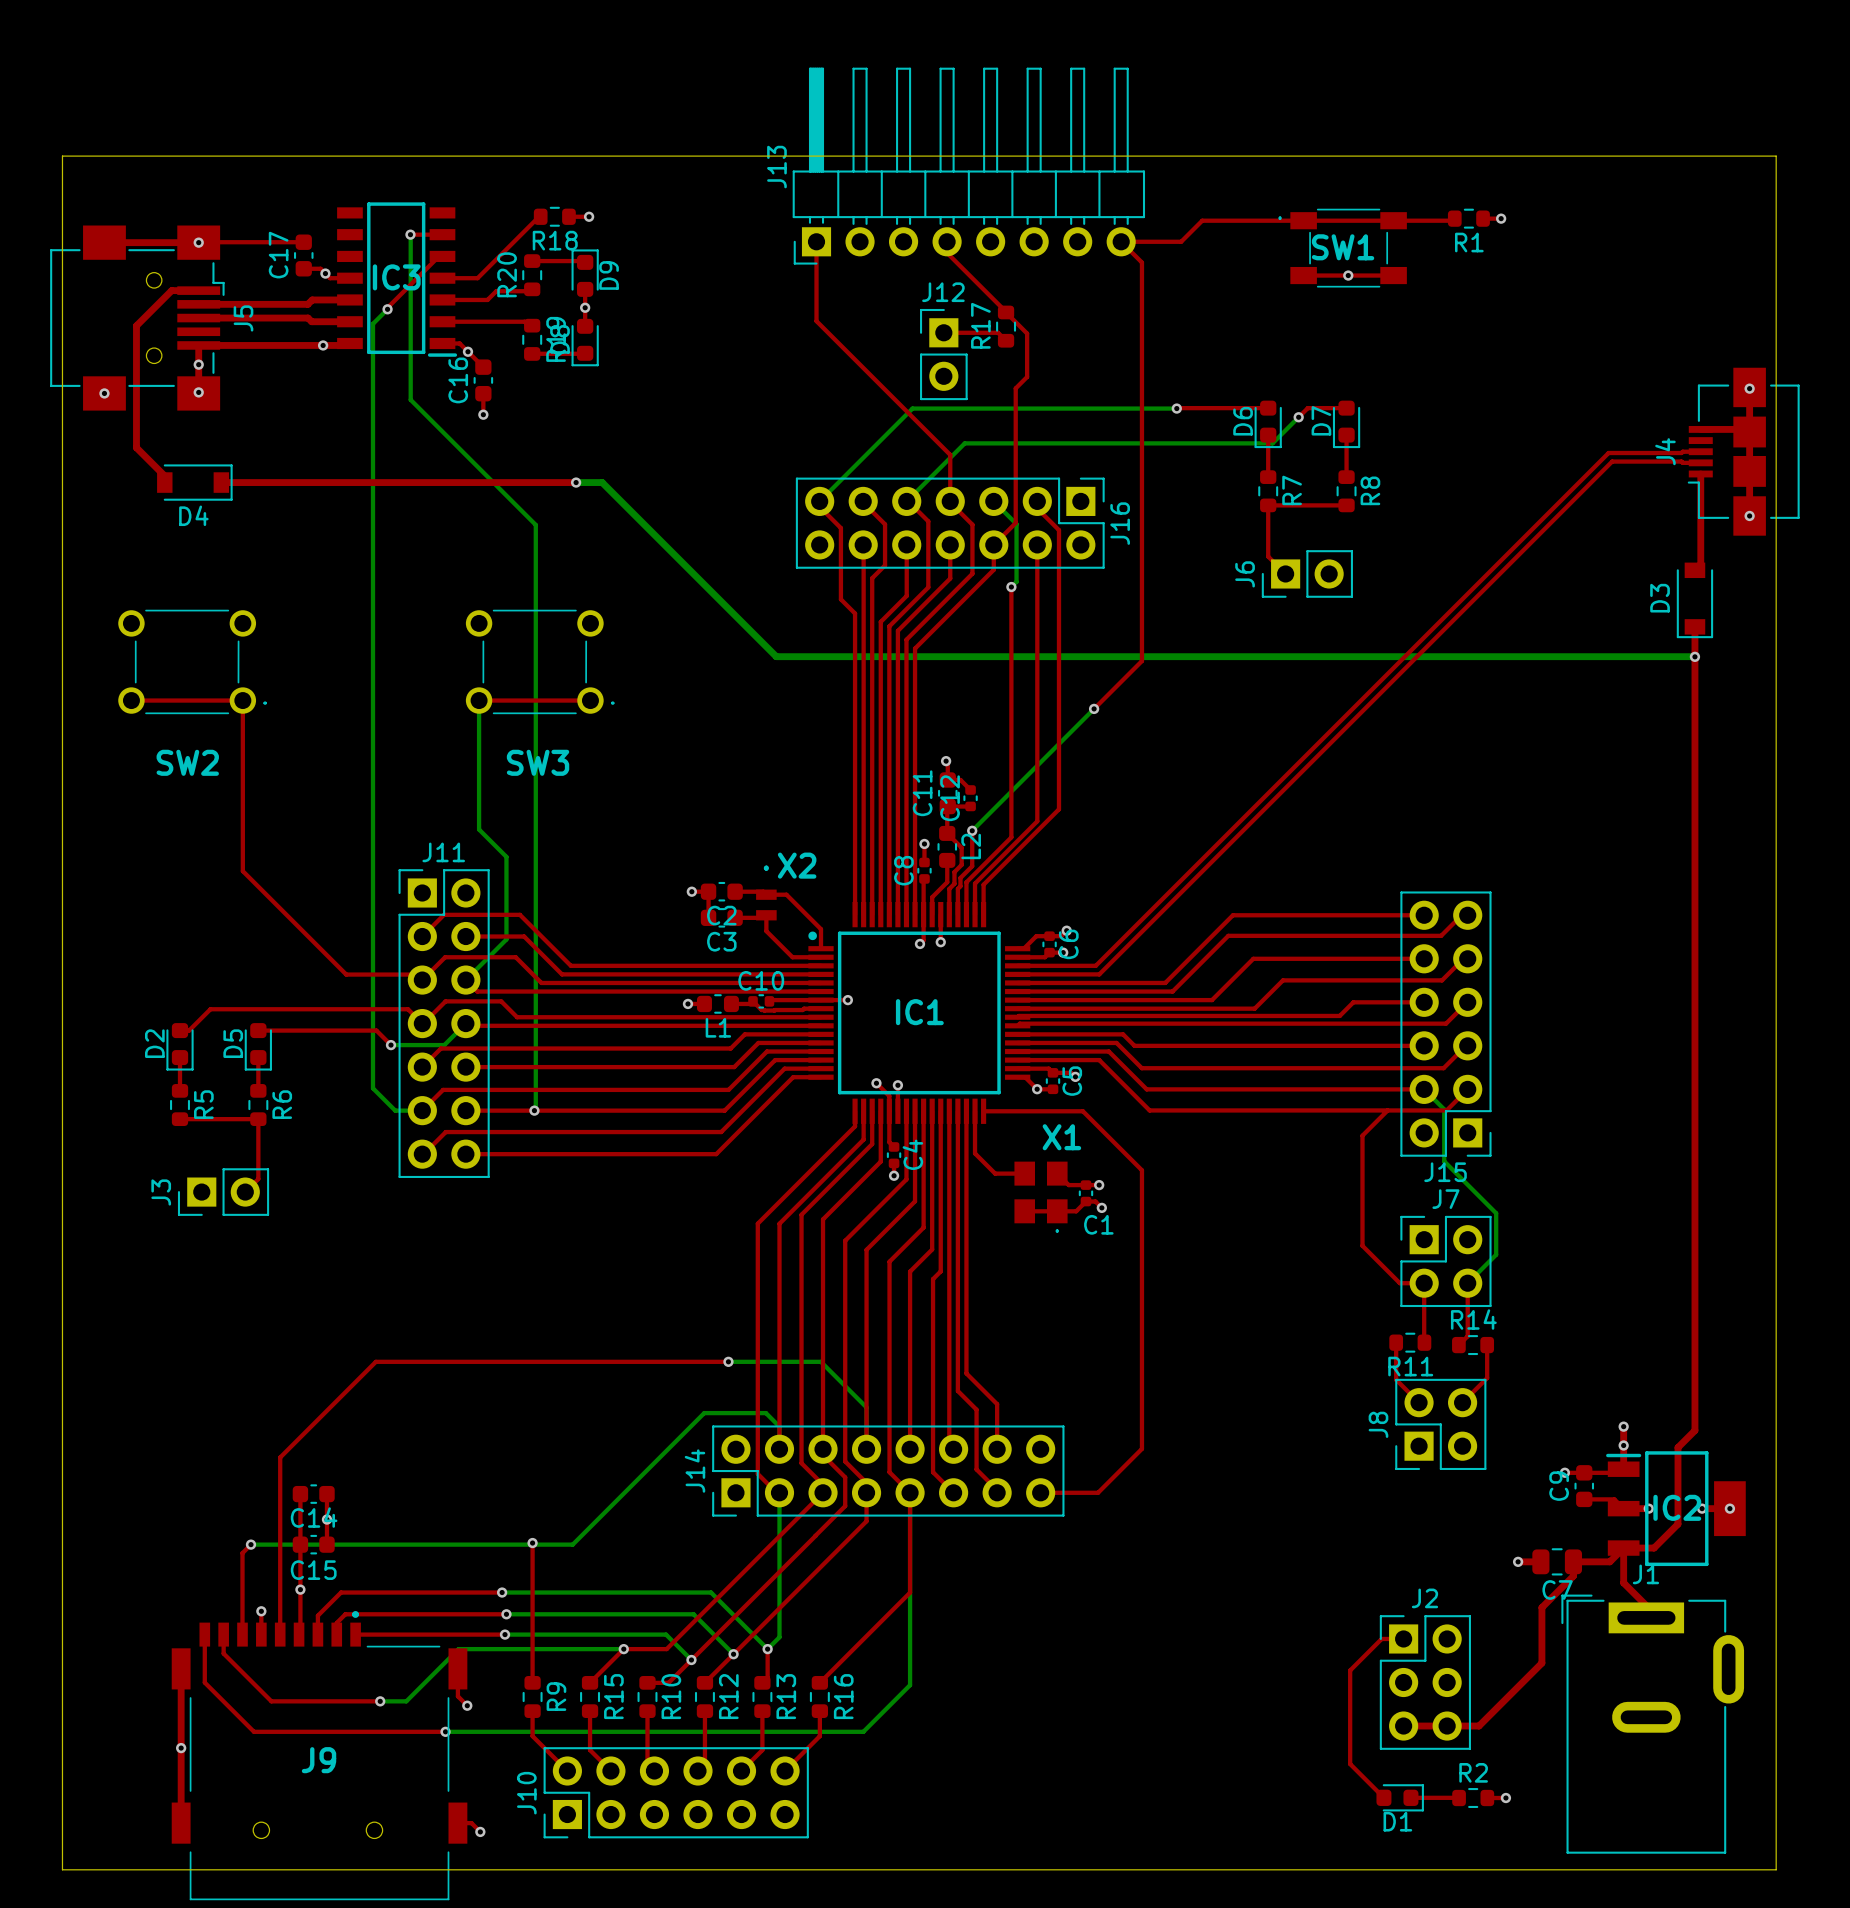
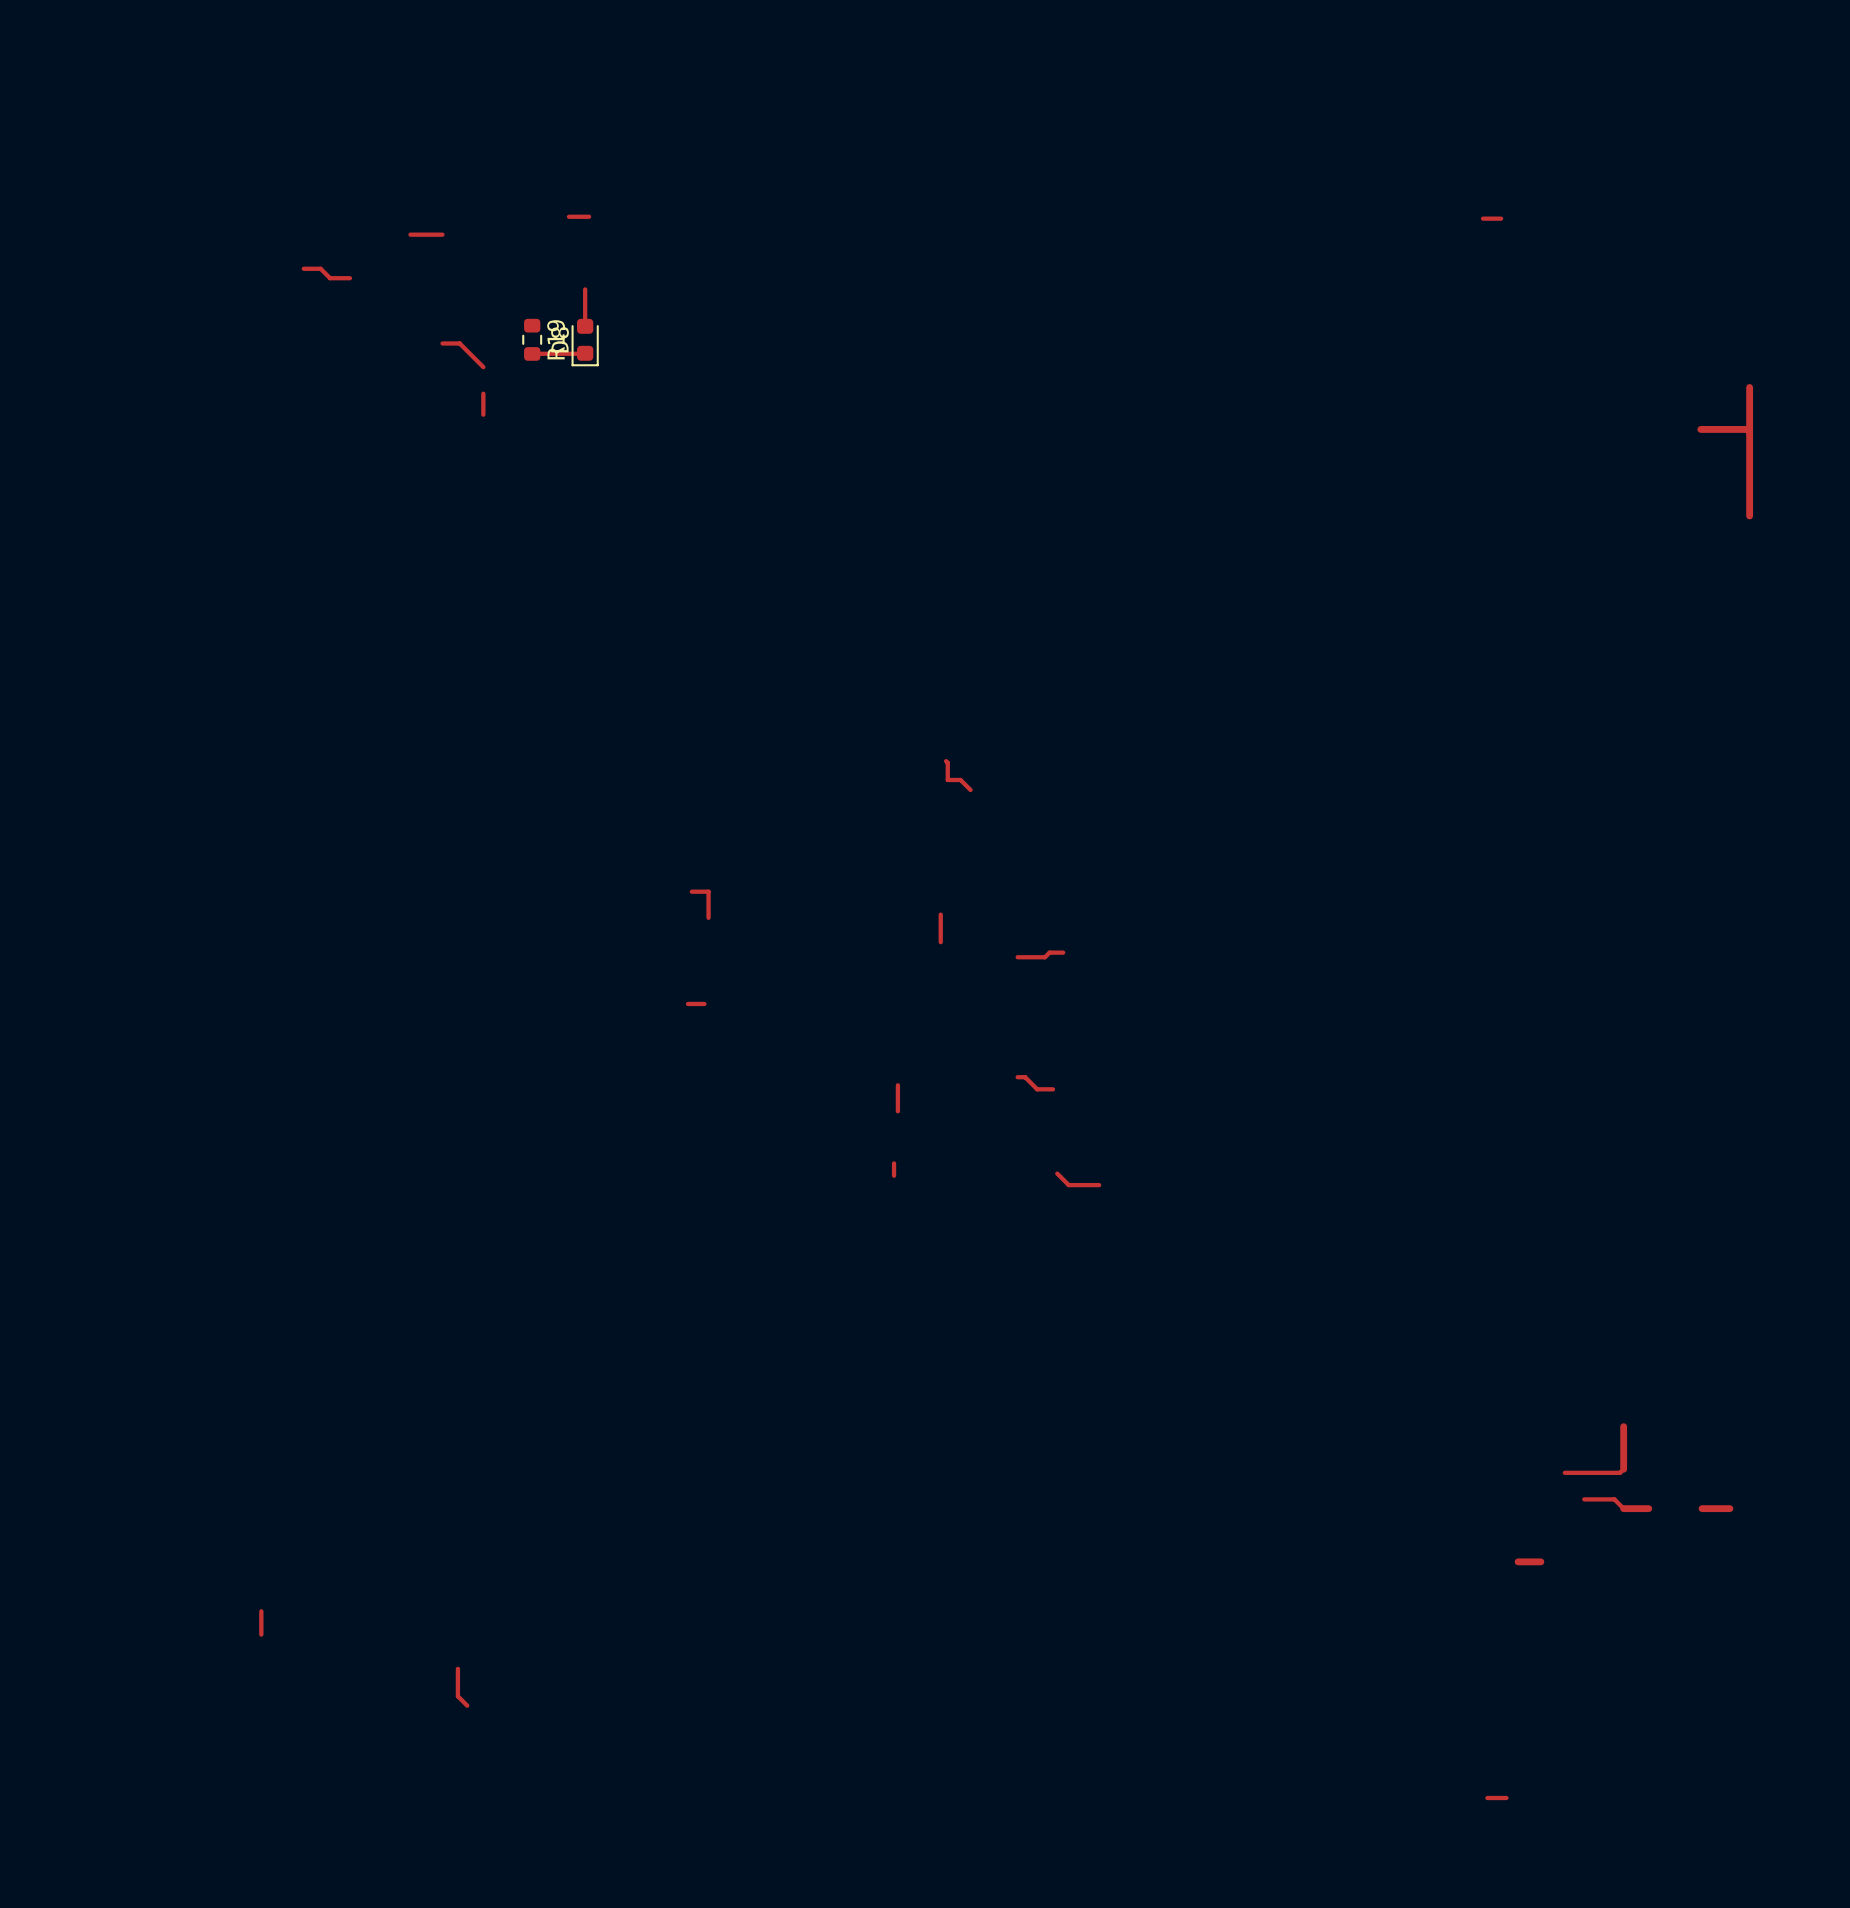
board edge: (62, 156) (62, 1869) (1776, 1869) (1776, 156) (62, 156) -> none
J13: (968, 166) -> none
top track: (540, 216) (477, 278) (442, 278) -> none
R18: (554, 216) -> none
via: (589, 216) -> none
top track: (1454, 218) (1452, 220) (1202, 220) (1181, 241) (1121, 241) (1141, 262) (1141, 661) (1094, 708) -> none
R1: (1468, 218) -> none
via: (1501, 218) -> none
bottom track: (410, 234) (410, 399) (535, 524) (534, 1110) -> none
via: (410, 234) -> none
top track: (816, 241) (816, 321) (950, 454) (950, 502) (972, 524) (972, 573) (906, 639) (906, 914) -> none
top track: (947, 241) (947, 252) (1027, 333) (1027, 376) (1015, 388) (1015, 523) (993, 544) (993, 569) (915, 648) (915, 914) -> none
via: (198, 242) -> none
top track: (303, 242) (104, 242) -> none
SW1: (1342, 248) -> none
C17: (303, 255) -> none
top track: (442, 256) (438, 256) (387, 309) -> none
top track: (532, 261) (585, 262) -> none
via: (325, 273) -> none
D9: (585, 273) -> none
R20: (532, 275) -> none
top track: (1303, 275) (1393, 275) -> none
via: (1348, 275) -> none
IC3: (397, 279) -> none
top track: (198, 290) (171, 290) (136, 325) (136, 447) (164, 476) (164, 482) -> none
top track: (532, 291) (496, 291) (487, 299) (442, 299) -> none
top track: (349, 299) (312, 299) (307, 304) (198, 304) (200, 304) -> none
via: (585, 307) -> none
bottom track: (387, 309) (373, 323) (373, 1088) (395, 1110) (422, 1110) -> none
via: (387, 309) -> none
J5: (137, 318) -> none
top track: (198, 318) (308, 318) (311, 321) (349, 321) -> none
top track: (442, 321) (524, 321) (528, 325) -> none
R17: (1006, 326) -> none
top track: (943, 332) (998, 332) (1006, 340) -> none
top track: (349, 343) (347, 345) (198, 345) (198, 393) -> none
via: (323, 345) -> none
via: (467, 351) -> none
J12: (943, 354) -> none
via: (198, 364) -> none
C16: (483, 380) -> none
via: (1749, 388) -> none
via: (198, 392) -> none
via: (104, 393) -> none
bottom track: (1176, 408) (912, 408) (819, 501) -> none
via: (1176, 408) -> none
top track: (1268, 408) (1176, 408) -> none
top track: (1346, 408) (1307, 408) (1298, 417) -> none
via: (483, 414) -> none
bottom track: (1298, 417) (1272, 443) (964, 443) (906, 501) -> none
via: (1298, 417) -> none
D6: (1268, 424) -> none
D7: (1346, 424) -> none
top track: (1268, 435) (1268, 477) -> none
top track: (1346, 435) (1346, 477) -> none
top track: (1700, 451) (1608, 453) (1095, 965) (1017, 965) -> none
J4: (1743, 451) -> none
top track: (1700, 462) (1612, 461) (1099, 974) (1017, 974) -> none
top track: (1700, 473) (1700, 564) (1694, 570) -> none
D4: (194, 482) -> none
top track: (221, 482) (576, 482) -> none
bottom track: (576, 482) (602, 482) (776, 656) (1694, 656) -> none
via: (576, 482) -> none
R7: (1268, 491) -> none
R8: (1346, 491) -> none
top track: (819, 501) (819, 506) (840, 528) (840, 599) (855, 613) (855, 914) -> none
top track: (863, 501) (885, 524) (885, 565) (872, 578) (872, 914) -> none
top track: (906, 501) (928, 521) (928, 587) (889, 626) (889, 914) -> none
bottom track: (993, 501) (1016, 524) (1016, 581) (1011, 587) -> none
top track: (1037, 501) (1037, 508) (1059, 530) (1059, 809) (983, 884) (983, 914) -> none
top track: (1346, 505) (1268, 505) (1268, 556) (1285, 573) -> none
via: (1749, 515) -> none
J16: (950, 523) -> none
top track: (863, 544) (863, 914) -> none
top track: (906, 544) (906, 595) (880, 621) (880, 914) -> none
top track: (950, 544) (950, 578) (897, 630) (897, 914) -> none
top track: (1037, 544) (1037, 821) (975, 883) (975, 914) -> none
J6: (1307, 573) -> none
top track: (1011, 587) (1011, 837) (966, 882) (966, 914) -> none
via: (1011, 587) -> none
D3: (1694, 600) -> none
top track: (1694, 626) (1694, 1430) (1677, 1447) (1677, 1524) (1654, 1548) (1623, 1548) -> none
via: (1694, 656) -> none
SW2: (192, 661) -> none
SW3: (540, 661) -> none
top track: (131, 700) (242, 700) (242, 871) (346, 974) (416, 974) (422, 980) (445, 957) (515, 957) (541, 982) (821, 982) -> none
top track: (479, 700) (590, 700) -> none
bottom track: (479, 700) (479, 829) (506, 856) (506, 939) (465, 980) -> none
bottom track: (1094, 708) (972, 830) -> none
via: (1094, 708) -> none
via: (946, 761) -> none
C11: (947, 793) -> none
C12: (970, 798) -> none
top track: (970, 806) (947, 807) (947, 833) (961, 847) (961, 864) (954, 872) (954, 883) (949, 888) (949, 914) -> none
top track: (972, 830) (972, 866) (960, 878) (960, 886) (957, 888) (957, 914) -> none
via: (972, 830) -> none
top track: (924, 843) (924, 862) -> none
via: (924, 843) -> none
L2: (947, 846) -> none
top track: (947, 860) (947, 882) (932, 897) (932, 914) -> none
C8: (924, 870) -> none
top track: (924, 878) (923, 940) (919, 943) -> none
via: (691, 891) -> none
C2: (721, 891) -> none
top track: (735, 891) (763, 891) (766, 894) (786, 894) (821, 929) (821, 948) -> none
X2: (766, 892) -> none
top track: (1424, 915) (1232, 915) (1165, 982) (1017, 982) -> none
top track: (1467, 915) (1461, 915) (1441, 935) (1228, 935) (1172, 991) (1017, 991) -> none
C3: (721, 917) -> none
top track: (735, 917) (763, 917) (766, 915) (766, 931) (792, 957) (821, 957) -> none
top track: (1066, 930) (1061, 936) (1036, 936) (1023, 948) (1017, 948) -> none
via: (1066, 930) -> none
top track: (422, 936) (444, 914) (519, 914) (570, 965) (821, 965) -> none
top track: (465, 936) (524, 936) (562, 974) (821, 974) -> none
via: (940, 942) -> none
via: (919, 943) -> none
C6: (1049, 944) -> none
via: (1063, 952) -> none
top track: (1424, 958) (1253, 958) (1212, 1000) (1017, 1000) -> none
top track: (1467, 958) (1463, 958) (1442, 980) (1282, 980) (1254, 1008) (1017, 1008) -> none
top track: (465, 980) (477, 991) (821, 991) -> none
top track: (847, 1000) (769, 1001) -> none
via: (847, 1000) -> none
C10: (761, 1001) -> none
top track: (1424, 1002) (1353, 1002) (1339, 1015) (1017, 1017) -> none
top track: (1467, 1002) (1446, 1023) (1019, 1023) (1017, 1025) -> none
via: (687, 1003) -> none
L1: (717, 1003) -> none
top track: (731, 1003) (750, 1003) (753, 1001) (764, 1010) (821, 1008) -> none
IC1: (919, 1012) -> none
top track: (821, 1017) (517, 1017) (501, 1001) (445, 1001) (423, 1023) (408, 1009) (210, 1009) (189, 1030) (180, 1030) -> none
J11: (444, 1023) -> none
top track: (457, 1023) (465, 1023) (468, 1025) (821, 1025) -> none
bottom track: (465, 1023) (444, 1045) (390, 1045) -> none
J15: (1445, 1024) -> none
top track: (258, 1030) (376, 1030) (390, 1045) -> none
top track: (821, 1034) (744, 1034) (730, 1048) (440, 1048) (422, 1067) -> none
top track: (1017, 1034) (1123, 1034) (1134, 1045) (1424, 1045) -> none
top track: (821, 1042) (758, 1042) (734, 1067) (465, 1067) -> none
top track: (1017, 1042) (1116, 1042) (1141, 1068) (1443, 1068) (1467, 1045) -> none
via: (390, 1045) -> none
D2: (180, 1046) -> none
D5: (258, 1046) -> none
top track: (821, 1051) (766, 1051) (728, 1089) (443, 1089) (422, 1110) -> none
top track: (1017, 1051) (1108, 1051) (1146, 1089) (1424, 1089) -> none
top track: (180, 1057) (180, 1090) -> none
top track: (258, 1057) (258, 1090) -> none
top track: (821, 1060) (775, 1060) (724, 1110) (465, 1110) -> none
top track: (1017, 1060) (1099, 1060) (1149, 1110) (1446, 1110) (1467, 1089) -> none
top track: (821, 1068) (784, 1068) (721, 1132) (445, 1132) (422, 1154) -> none
top track: (1017, 1068) (1048, 1068) (1053, 1072) (1071, 1072) (1075, 1076) -> none
via: (1075, 1076) -> none
top track: (821, 1077) (793, 1077) (716, 1154) (465, 1154) -> none
C5: (1053, 1081) -> none
top track: (876, 1083) (889, 1096) (889, 1142) (894, 1146) -> none
via: (876, 1083) -> none
via: (897, 1085) -> none
via: (1037, 1089) -> none
bottom track: (1424, 1089) (1444, 1109) (1444, 1161) (1496, 1213) (1496, 1254) (1467, 1283) -> none
R5: (180, 1105) -> none
R6: (258, 1105) -> none
via: (534, 1110) -> none
top track: (1387, 1110) (1362, 1135) (1362, 1245) (1399, 1283) (1424, 1283) (1424, 1342) -> none
top track: (855, 1111) (855, 1126) (757, 1223) (757, 1473) (776, 1492) (779, 1492) -> none
top track: (863, 1111) (863, 1139) (779, 1223) (779, 1449) -> none
top track: (872, 1111) (872, 1144) (801, 1214) (801, 1463) (823, 1484) (823, 1492) (666, 1649) (623, 1649) (590, 1682) -> none
top track: (880, 1111) (880, 1161) (823, 1219) (823, 1455) (845, 1477) (845, 1506) (815, 1535) -> none
top track: (906, 1111) (906, 1179) (845, 1240) (845, 1461) (866, 1482) (866, 1521) (704, 1682) -> none
top track: (915, 1111) (915, 1201) (866, 1249) (866, 1449) -> none
top track: (923, 1111) (923, 1227) (889, 1261) (889, 1472) (910, 1492) (910, 1592) (819, 1682) -> none
top track: (932, 1111) (932, 1249) (910, 1271) (910, 1449) -> none
top track: (940, 1111) (940, 1271) (933, 1279) (933, 1472) (953, 1492) -> none
top track: (949, 1111) (949, 1444) (953, 1449) -> none
top track: (957, 1111) (957, 1391) (976, 1409) (976, 1469) (997, 1490) (997, 1492) -> none
top track: (966, 1111) (966, 1373) (997, 1404) (997, 1449) -> none
top track: (975, 1111) (975, 1153) (995, 1173) (1024, 1173) -> none
top track: (983, 1111) (1082, 1111) (1141, 1170) (1141, 1448) (1098, 1492) (1040, 1492) -> none
top track: (180, 1119) (258, 1119) (258, 1179) (245, 1192) -> none
C4: (894, 1155) -> none
via: (894, 1175) -> none
via: (1099, 1185) -> none
J3: (223, 1192) -> none
C1: (1085, 1193) -> none
X1: (1041, 1197) -> none
top track: (1101, 1207) (1095, 1201) (1085, 1201) (1076, 1211) (1024, 1211) -> none
via: (1101, 1207) -> none
J7: (1445, 1261) -> none
top track: (1467, 1283) (1467, 1336) (1458, 1345) -> none
top track: (1396, 1342) (1396, 1379) (1419, 1402) -> none
R11: (1410, 1342) -> none
R14: (1473, 1345) -> none
top track: (1487, 1345) (1487, 1378) (1462, 1402) -> none
top track: (728, 1361) (375, 1361) (280, 1457) (280, 1634) -> none
bottom track: (728, 1361) (820, 1361) (866, 1407) (866, 1449) -> none
via: (728, 1361) -> none
J8: (1440, 1424) -> none
via: (1623, 1426) -> none
via: (1623, 1445) -> none
bottom track: (779, 1449) (779, 1426) (765, 1413) (704, 1413) (572, 1544) (250, 1544) -> none
J14: (888, 1471) -> none
via: (1564, 1472) -> none
C9: (1584, 1486) -> none
bottom track: (779, 1492) (779, 1637) (767, 1649) (711, 1592) (502, 1592) -> none
bottom track: (910, 1492) (910, 1685) (863, 1731) (445, 1731) -> none
top track: (300, 1494) (299, 1634) -> none
C14: (313, 1494) -> none
top track: (326, 1494) (326, 1544) -> none
via: (1648, 1508) -> none
IC2: (1675, 1508) -> none
via: (1702, 1508) -> none
via: (1729, 1508) -> none
via: (326, 1519) -> none
top track: (815, 1535) (668, 1682) (647, 1682) -> none
top track: (532, 1543) (532, 1682) -> none
via: (532, 1543) -> none
top track: (250, 1544) (242, 1553) (242, 1634) -> none
via: (250, 1544) -> none
C15: (313, 1544) -> none
top track: (1623, 1548) (1623, 1582) (1646, 1605) (1646, 1617) -> none
top track: (1623, 1548) (1609, 1561) (1573, 1561) (1573, 1576) (1541, 1607) (1541, 1663) (1479, 1726) (1403, 1726) -> none
via: (1518, 1561) -> none
C7: (1557, 1561) -> none
via: (300, 1589) -> none
top track: (502, 1592) (341, 1592) (317, 1615) (317, 1634) -> none
via: (502, 1592) -> none
via: (261, 1611) -> none
top track: (506, 1614) (345, 1614) (336, 1622) (336, 1634) -> none
bottom track: (506, 1614) (693, 1614) (733, 1654) -> none
via: (506, 1614) -> none
top track: (204, 1634) (204, 1682) (254, 1731) (445, 1731) -> none
top track: (223, 1634) (223, 1653) (271, 1701) (380, 1701) -> none
top track: (355, 1634) (505, 1634) -> none
bottom track: (505, 1634) (666, 1634) (691, 1660) -> none
via: (505, 1634) -> none
top track: (1403, 1638) (1381, 1638) (1350, 1670) (1350, 1764) (1383, 1797) -> none
bottom track: (623, 1649) (458, 1649) (406, 1701) (380, 1701) -> none
via: (623, 1649) -> none
top track: (767, 1649) (767, 1677) (762, 1682) -> none
via: (767, 1649) -> none
via: (733, 1654) -> none
via: (691, 1660) -> none
top track: (181, 1668) (181, 1823) -> none
J2: (1425, 1682) -> none
R9: (532, 1697) -> none
R15: (590, 1697) -> none
R10: (647, 1697) -> none
R12: (704, 1697) -> none
R13: (762, 1697) -> none
R16: (819, 1697) -> none
via: (380, 1701) -> none
via: (467, 1705) -> none
top track: (532, 1711) (532, 1736) (567, 1770) -> none
top track: (590, 1711) (590, 1750) (610, 1770) -> none
top track: (647, 1711) (647, 1764) (654, 1770) -> none
top track: (704, 1711) (704, 1764) (697, 1770) -> none
top track: (762, 1711) (762, 1750) (741, 1770) -> none
top track: (819, 1711) (819, 1736) (785, 1770) -> none
J1: (1652, 1724) -> none
via: (445, 1731) -> none
via: (181, 1748) -> none
J9: (319, 1755) -> none
J10: (676, 1792) -> none
D1: (1400, 1797) -> none
top track: (1410, 1797) (1458, 1797) -> none
R2: (1473, 1798) -> none
via: (1505, 1798) -> none
top track: (457, 1823) (471, 1823) (480, 1831) -> none
via: (480, 1831) -> none

